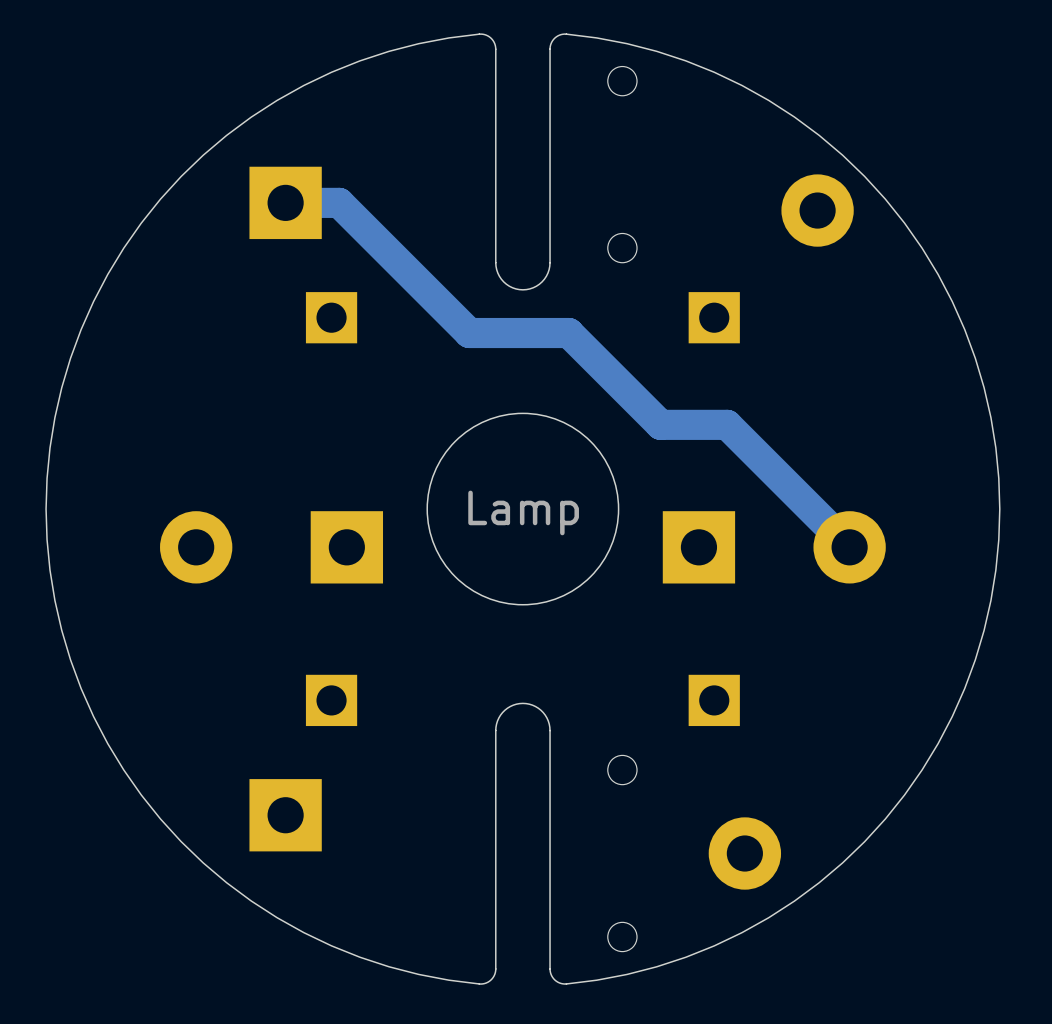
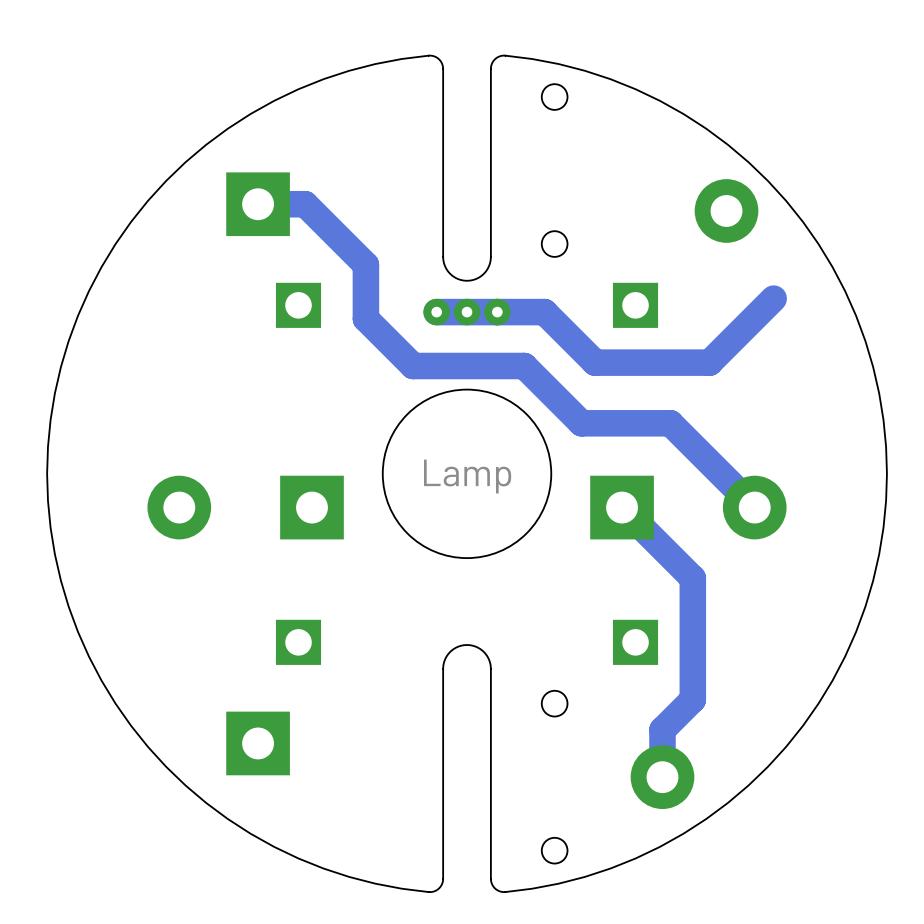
track: (408, 271) (469, 333) (568, 333) (660, 424) (727, 424) (753, 451) -> (365, 264) (365, 318) (413, 366) (524, 366) (581, 423) (670, 423)
track: none -> (773, 298) (709, 362) (595, 362) (544, 312) (436, 312)
via: none -> (436, 312)
via: none -> (467, 312)
via: none -> (497, 312)
track: none -> (622, 507) (692, 578) (692, 699) (662, 729) (662, 780)

